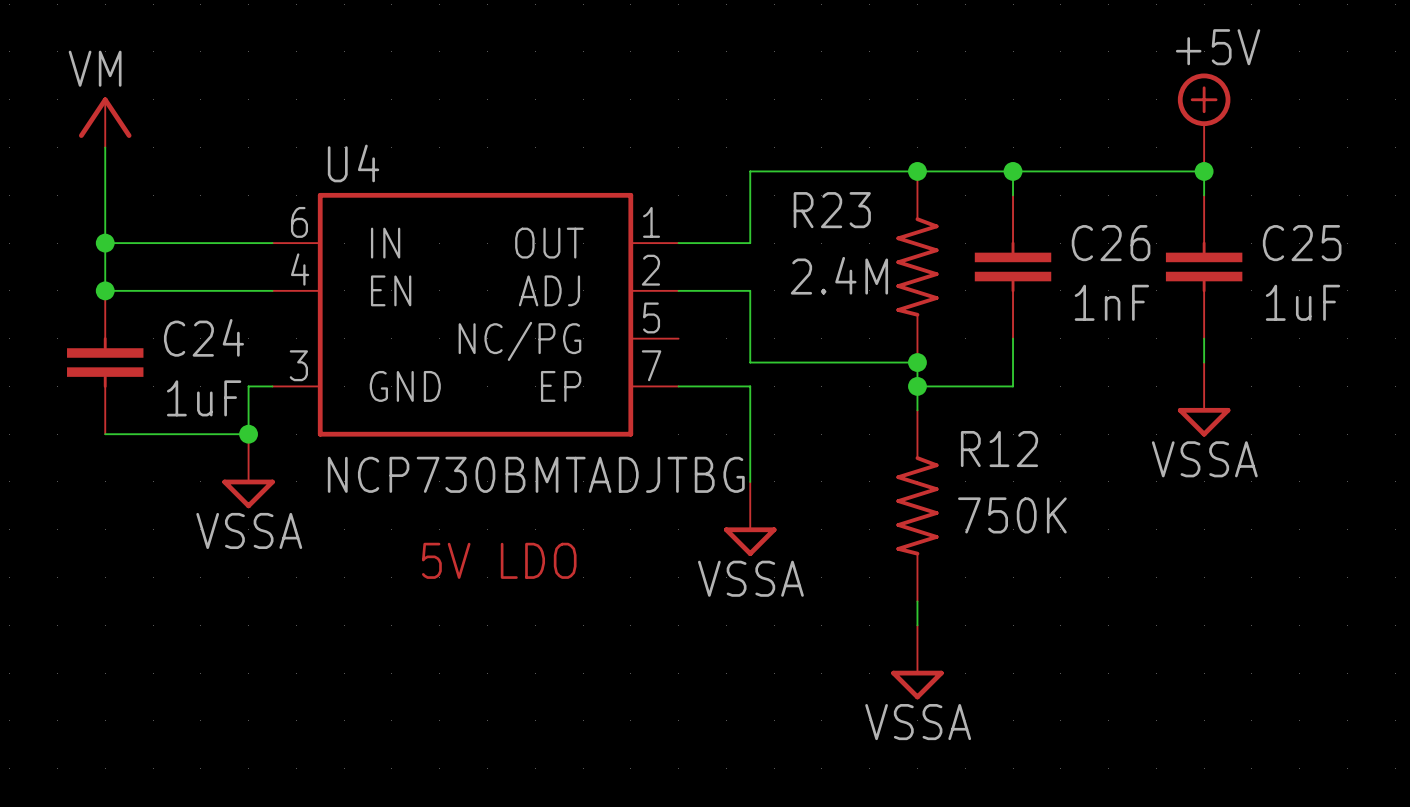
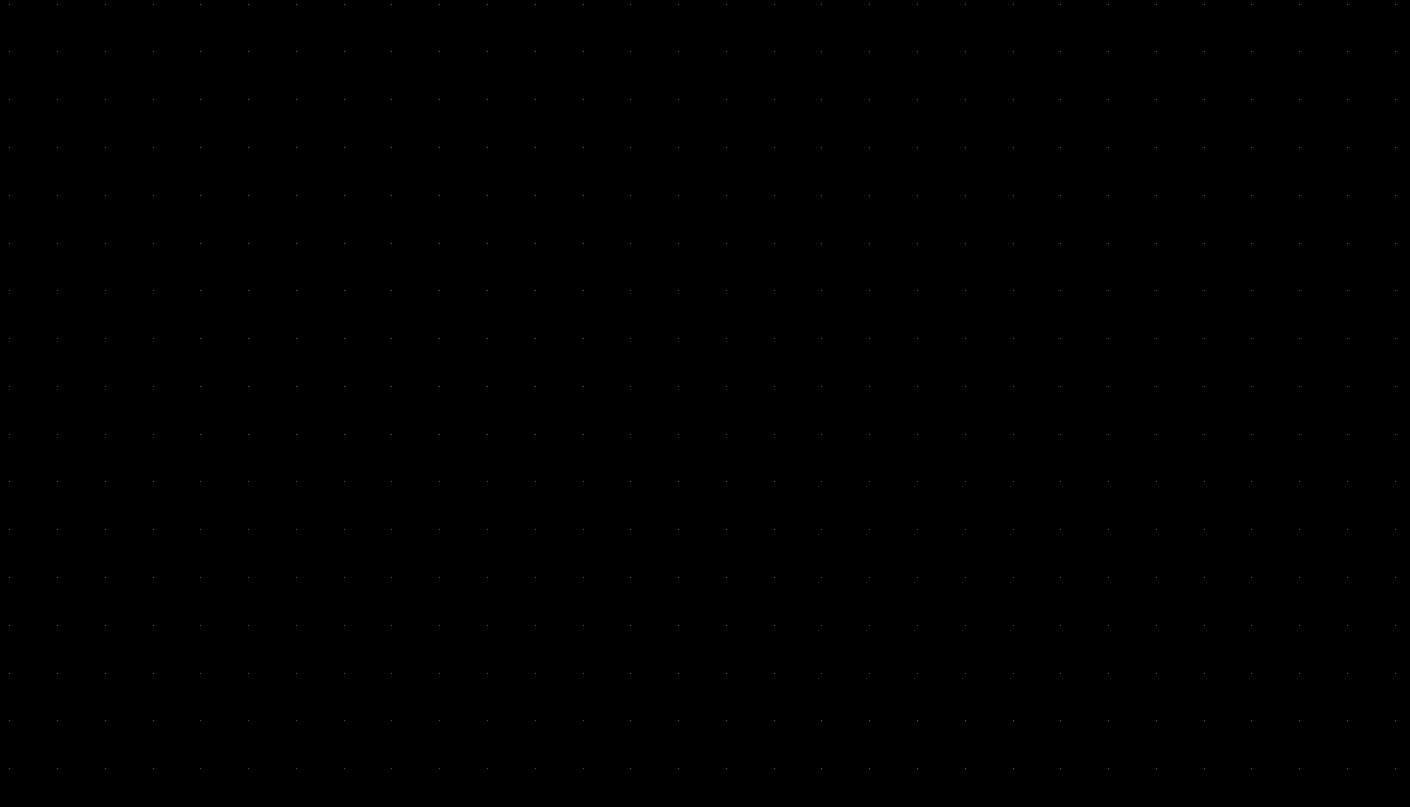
power symbol: VM (105, 122) -> none
power symbol: +5V (1204, 122) -> none
wire: (105, 147) (105, 290) (272, 290) -> none
junction: (917, 171) -> none
wire: (1013, 171) (1013, 195) -> none
junction: (1013, 171) -> none
junction: (1204, 171) -> none
wire: (1204, 195) (1204, 171) (750, 171) (750, 243) (678, 243) -> none
wire: (105, 243) (272, 243) -> none
junction: (105, 243) -> none
R23: 2.4M (917, 266) -> none
C26: 1nF (1013, 266) -> none
C25: 1uF (1204, 266) -> none
junction: (105, 290) -> none
wire: (678, 290) (750, 290) (750, 362) (917, 362) (917, 410) -> none
U4: (475, 314) -> none
wire: (1013, 338) (1013, 386) (917, 386) -> none
wire: (1204, 338) (1204, 362) -> none
C24: 1uF (105, 362) -> none
junction: (917, 362) -> none
wire: (272, 386) (248, 386) (248, 434) (105, 434) -> none
wire: (678, 386) (750, 386) (750, 481) -> none
junction: (917, 386) -> none
power symbol: VSSA (1204, 399) -> none
junction: (248, 434) -> none
power symbol: VSSA (248, 471) -> none
R12: 750K (917, 505) -> none
power symbol: VSSA (750, 519) -> none
text: 5V LDO (499, 560) -> none
wire: (917, 601) (917, 625) -> none
power symbol: VSSA (917, 662) -> none

